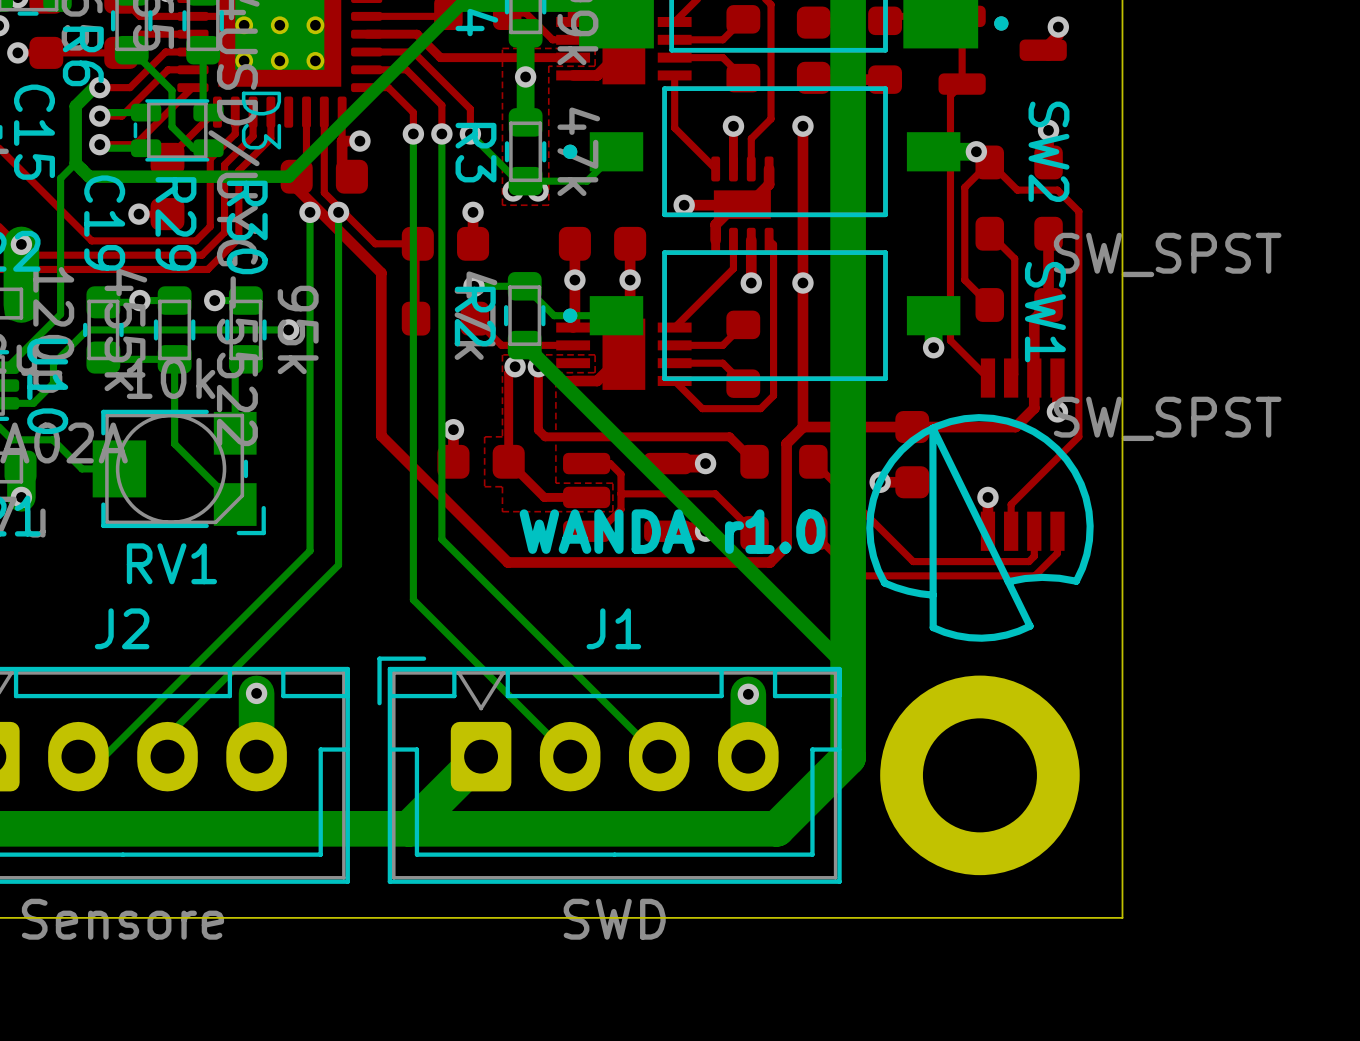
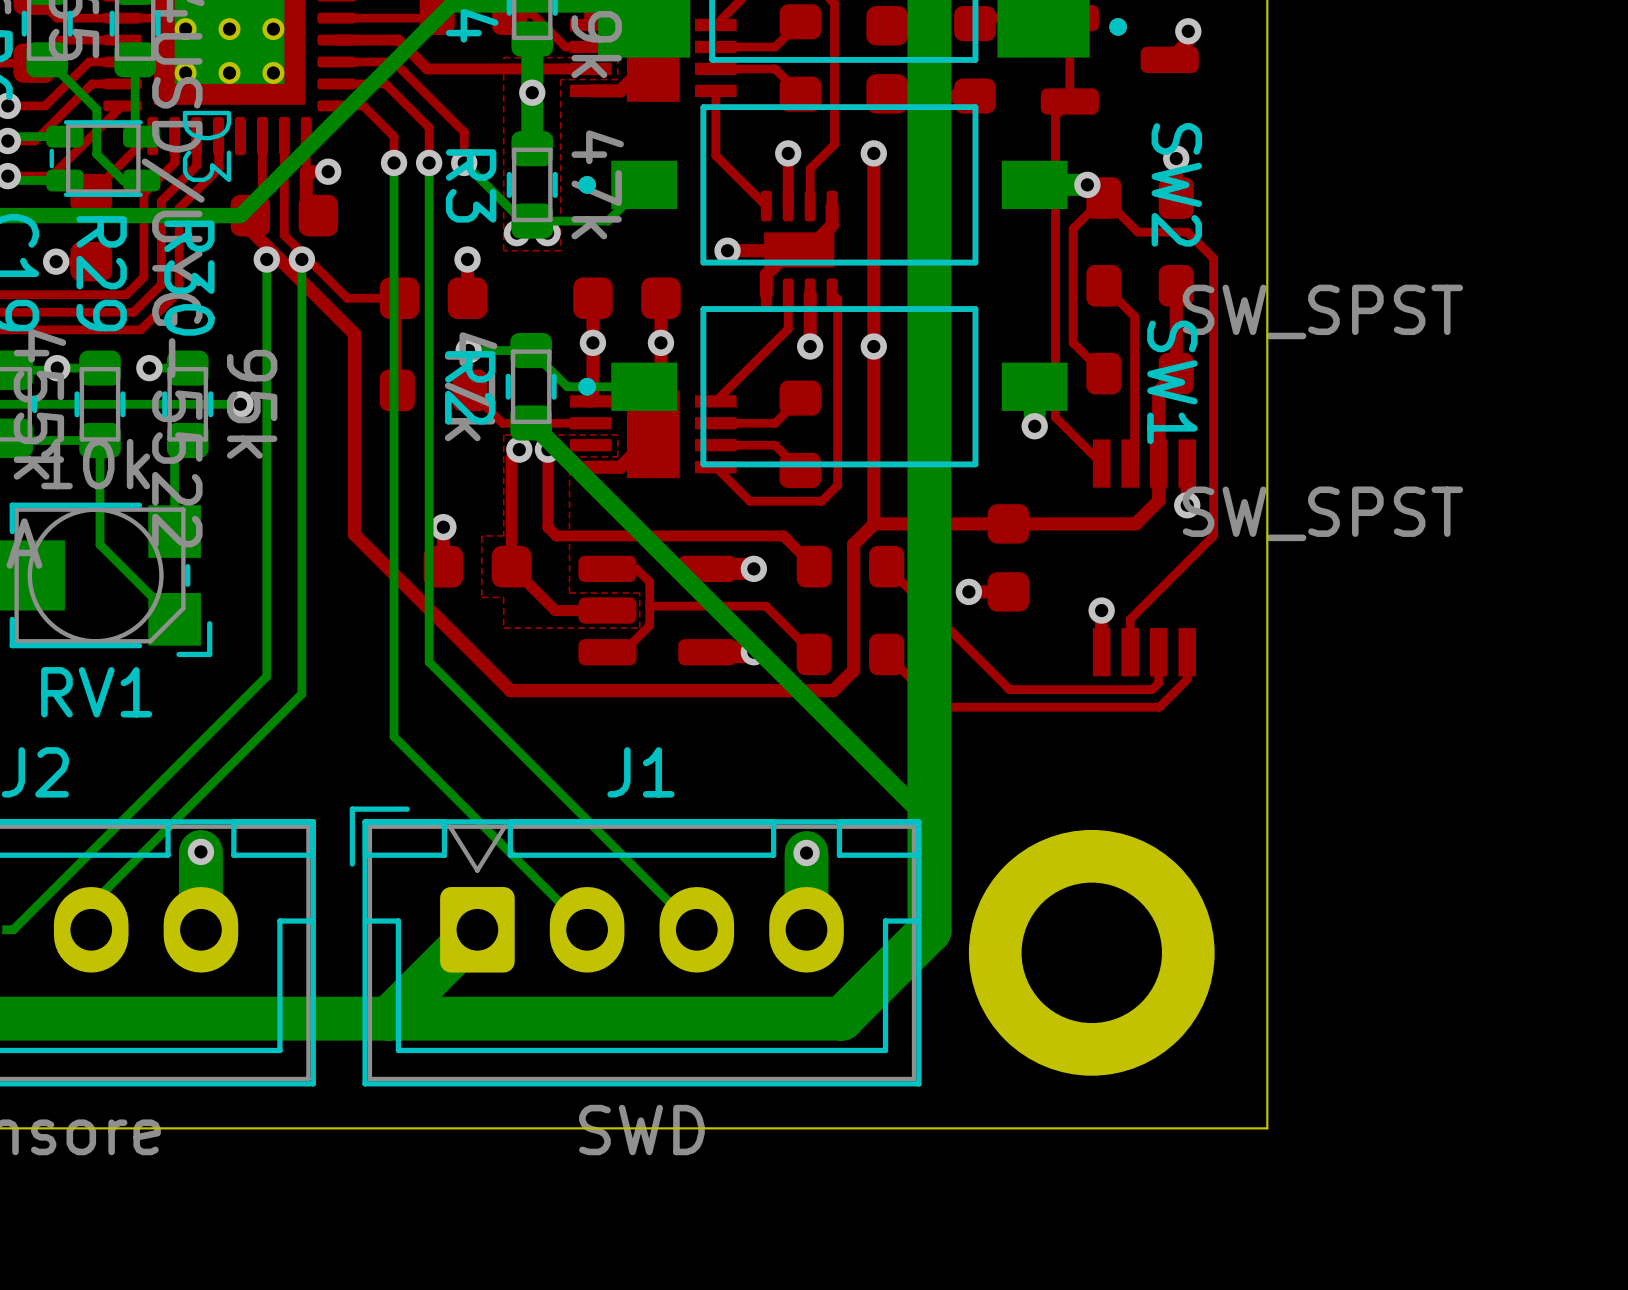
line: (932, 428) (933, 627) (956, 635) (981, 638) (1006, 634) (1030, 626) (932, 428) -> none
text: WANDA r1.0 (672, 531) -> none
line: (1008, 581) (1042, 577) (1076, 581) (1086, 554) (1089, 540) (1088, 511) (1085, 497) (1074, 471) (1056, 448) (1045, 439) (1021, 425) (1007, 421) (993, 418) (964, 418) (950, 421) (924, 432) (901, 450) (884, 473) (877, 486) (870, 513) (870, 542) (873, 556) (884, 583) (908, 591) (933, 595) -> none

